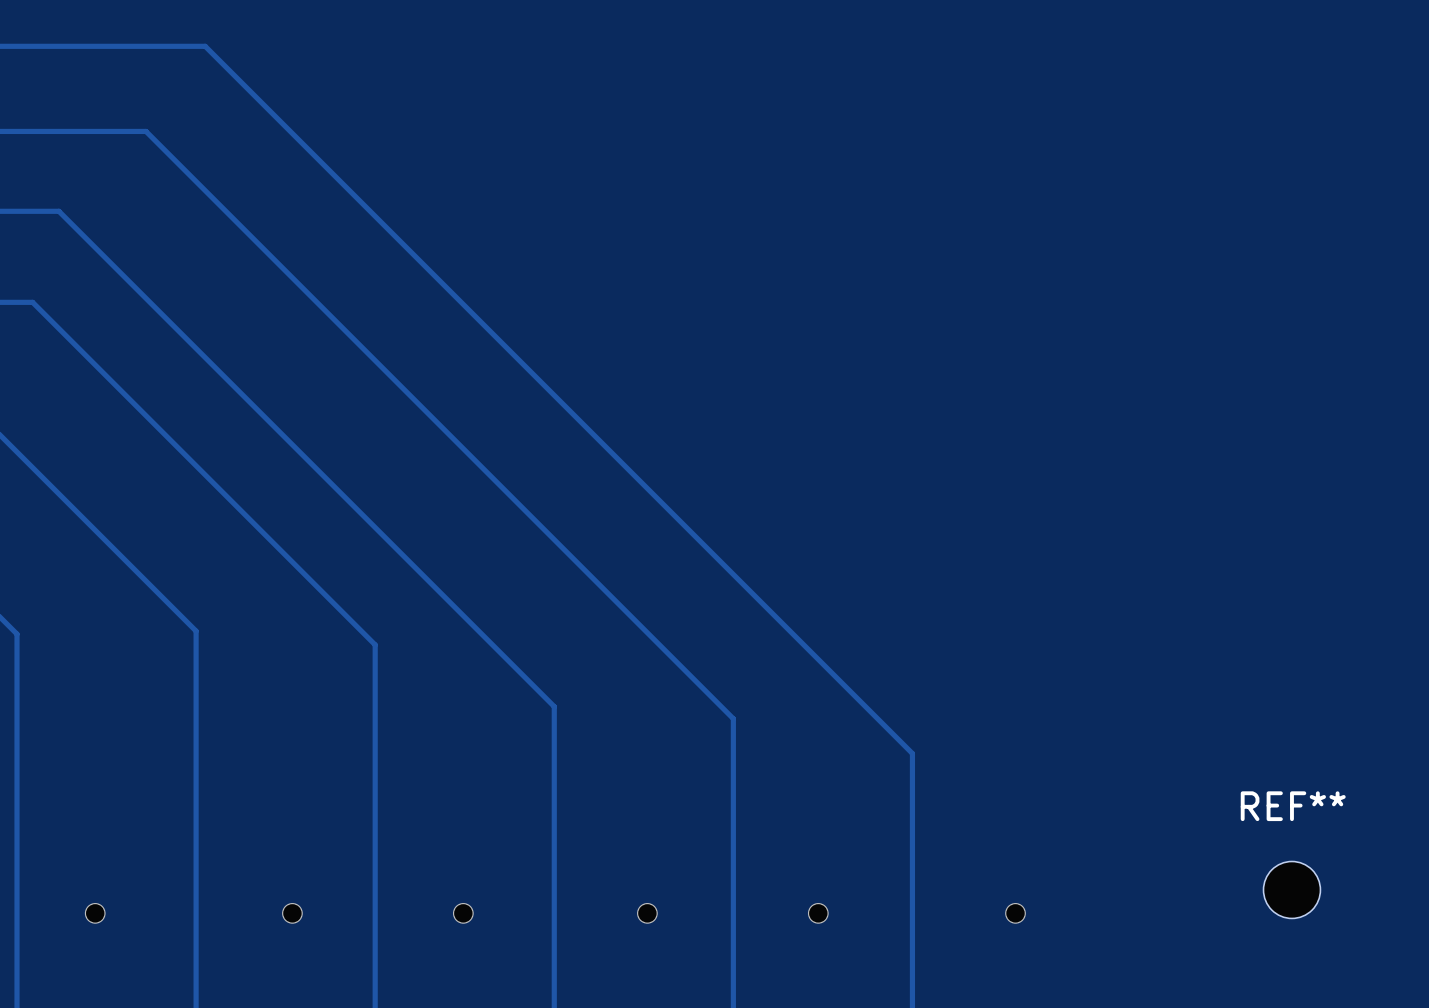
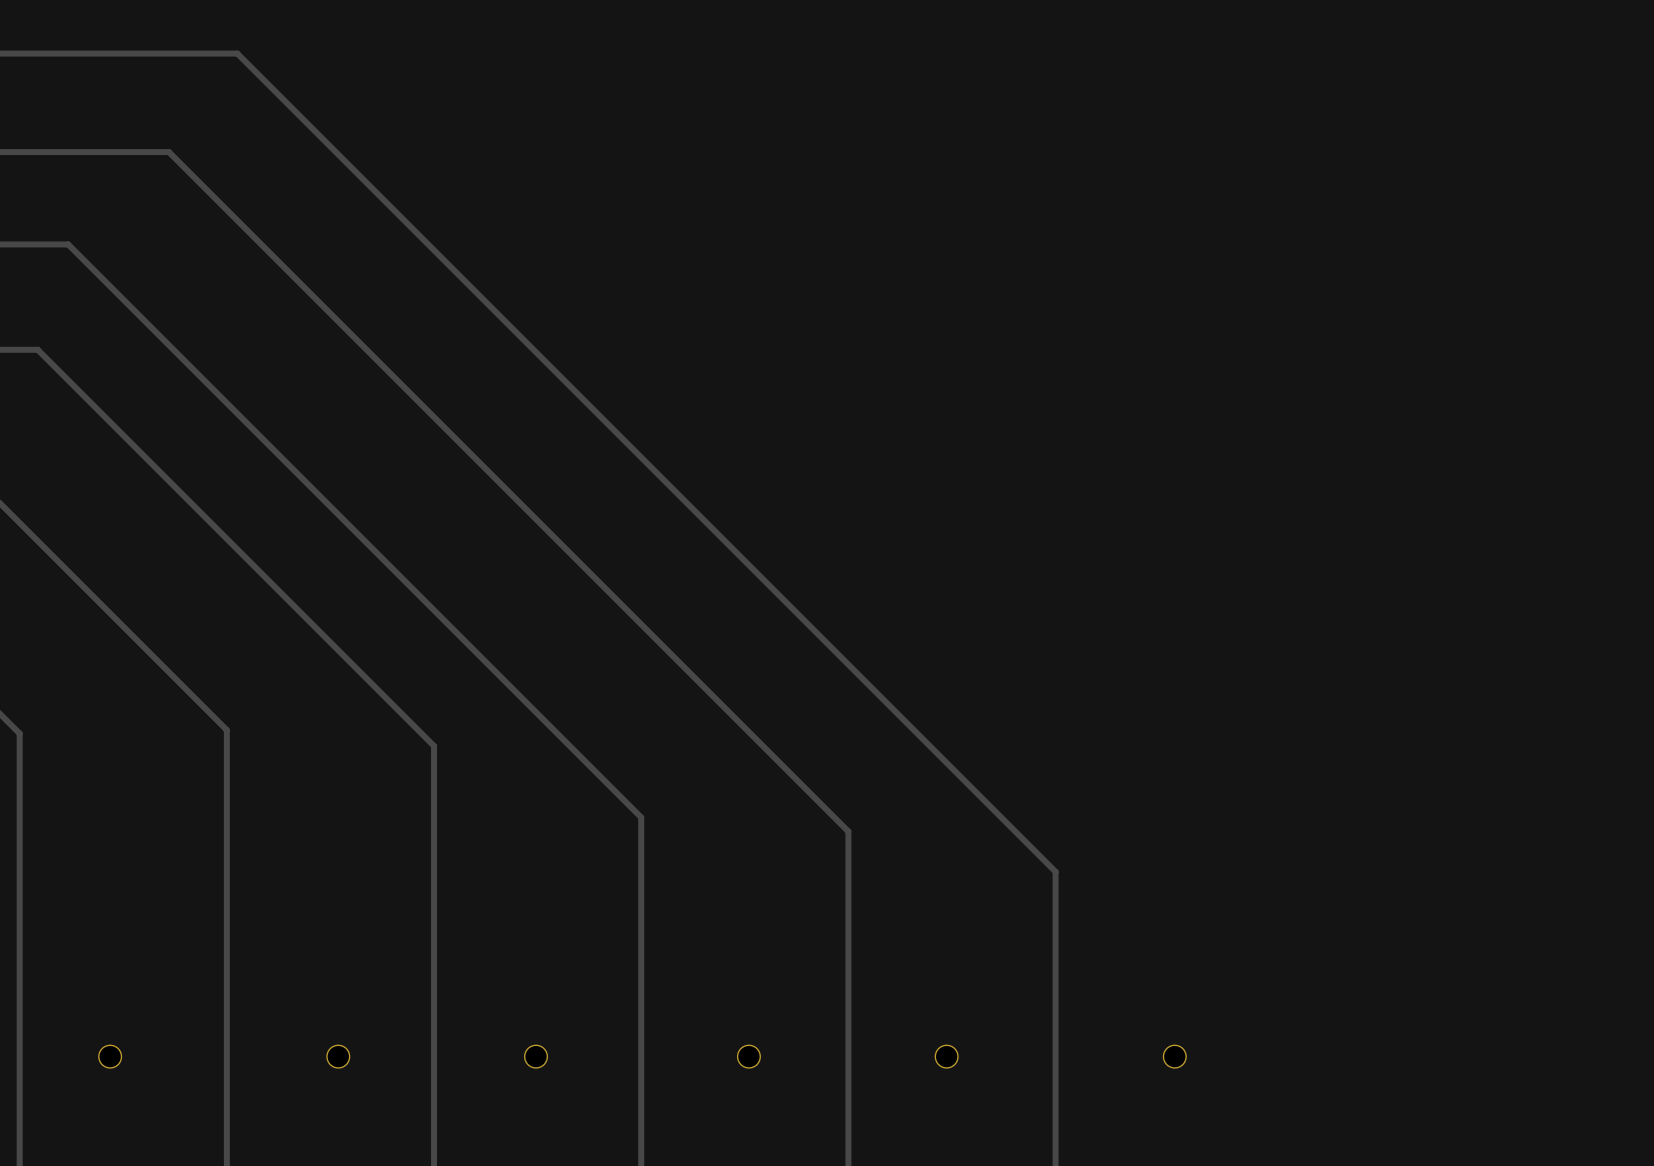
REF**: (1291, 889) -> none

